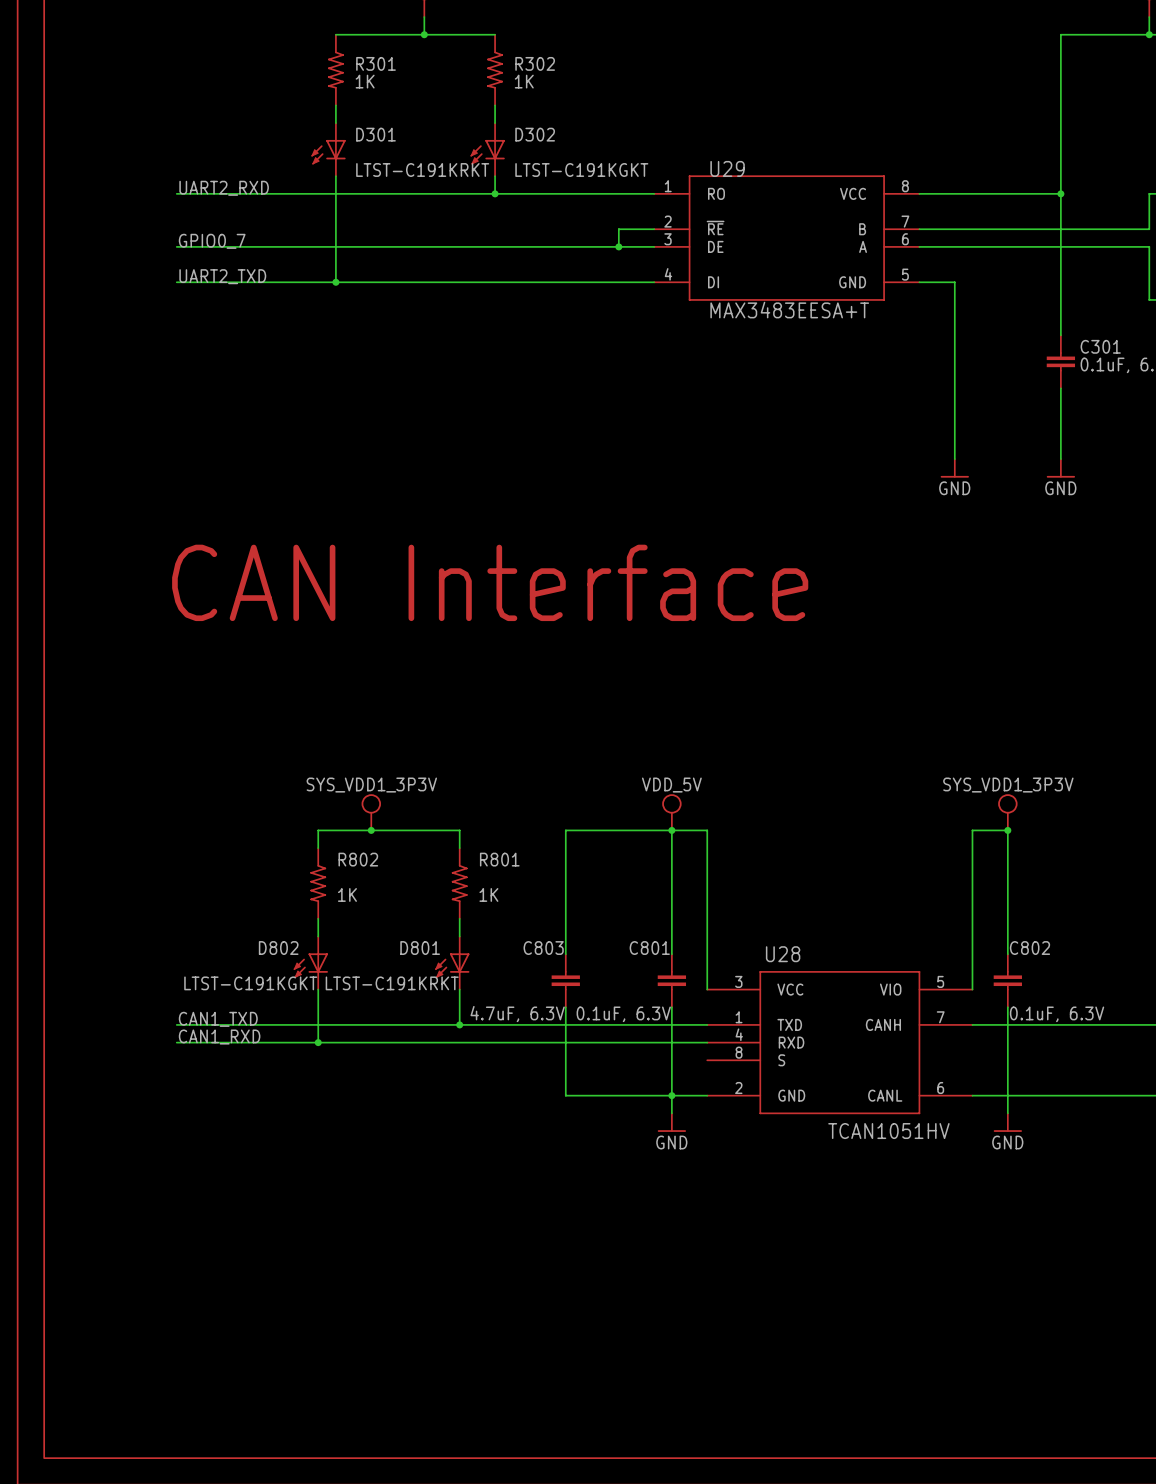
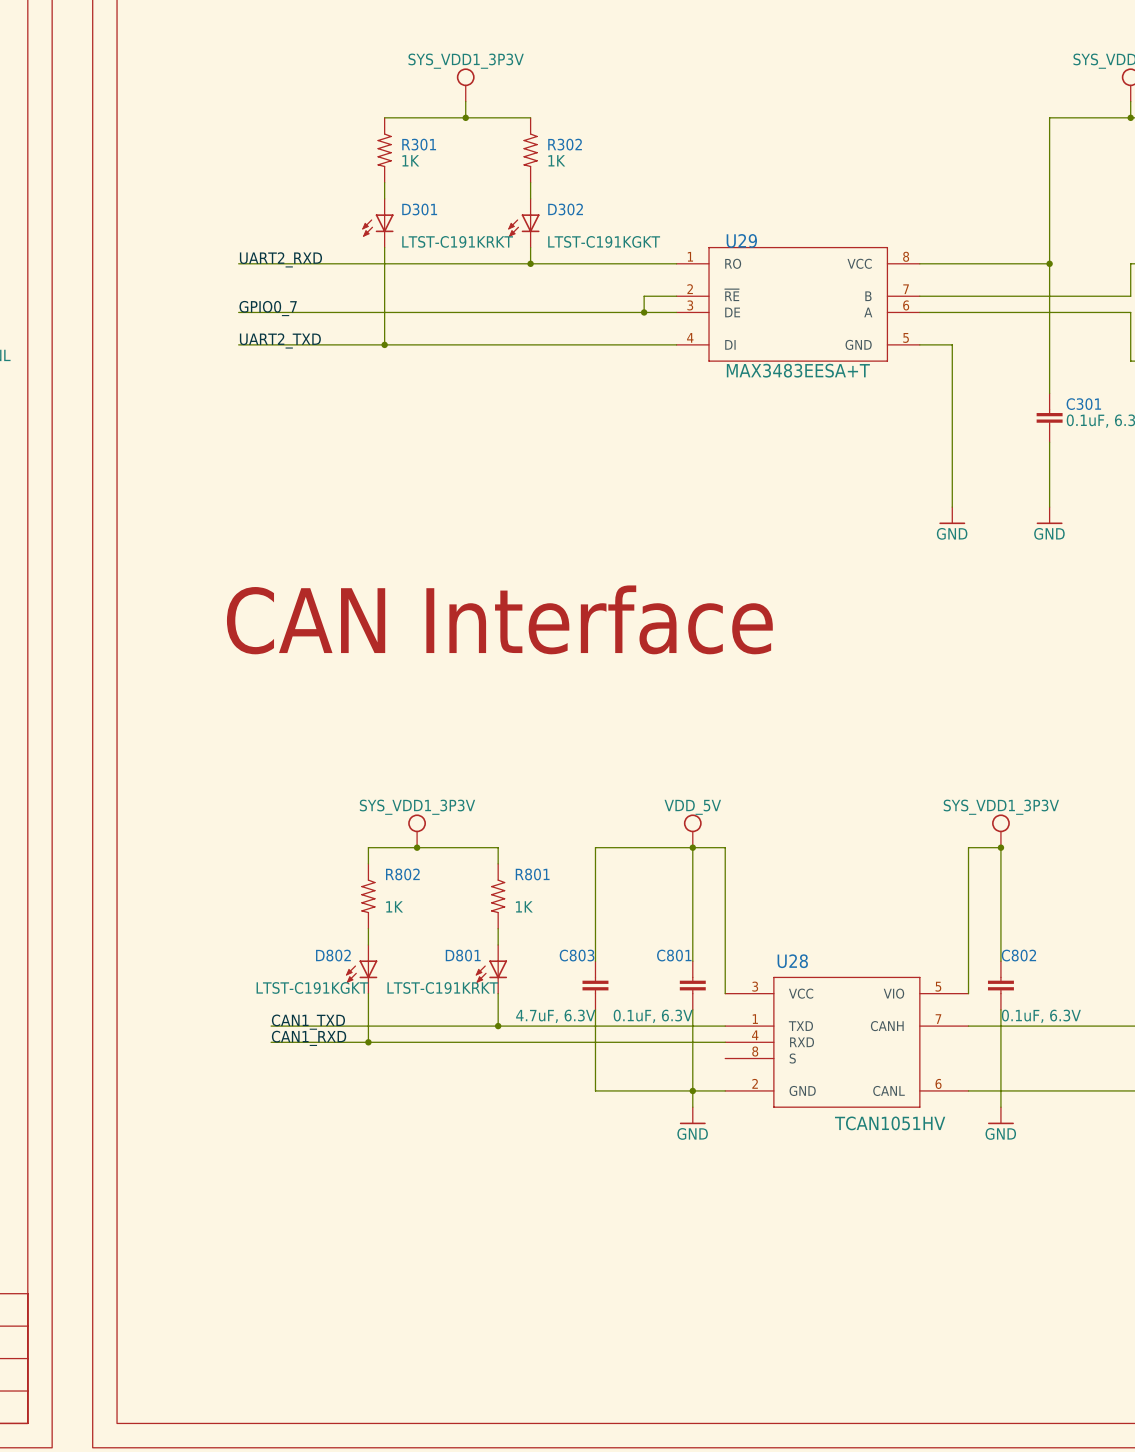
label position: CAN1_TXD (218, 1019) -> CAN1_TXD (308, 1022)
wire: (176, 1024) (212, 1024) -> none
label position: CAN1_RXD (219, 1037) -> CAN1_RXD (309, 1038)
wire: (176, 1042) (212, 1042) -> none

